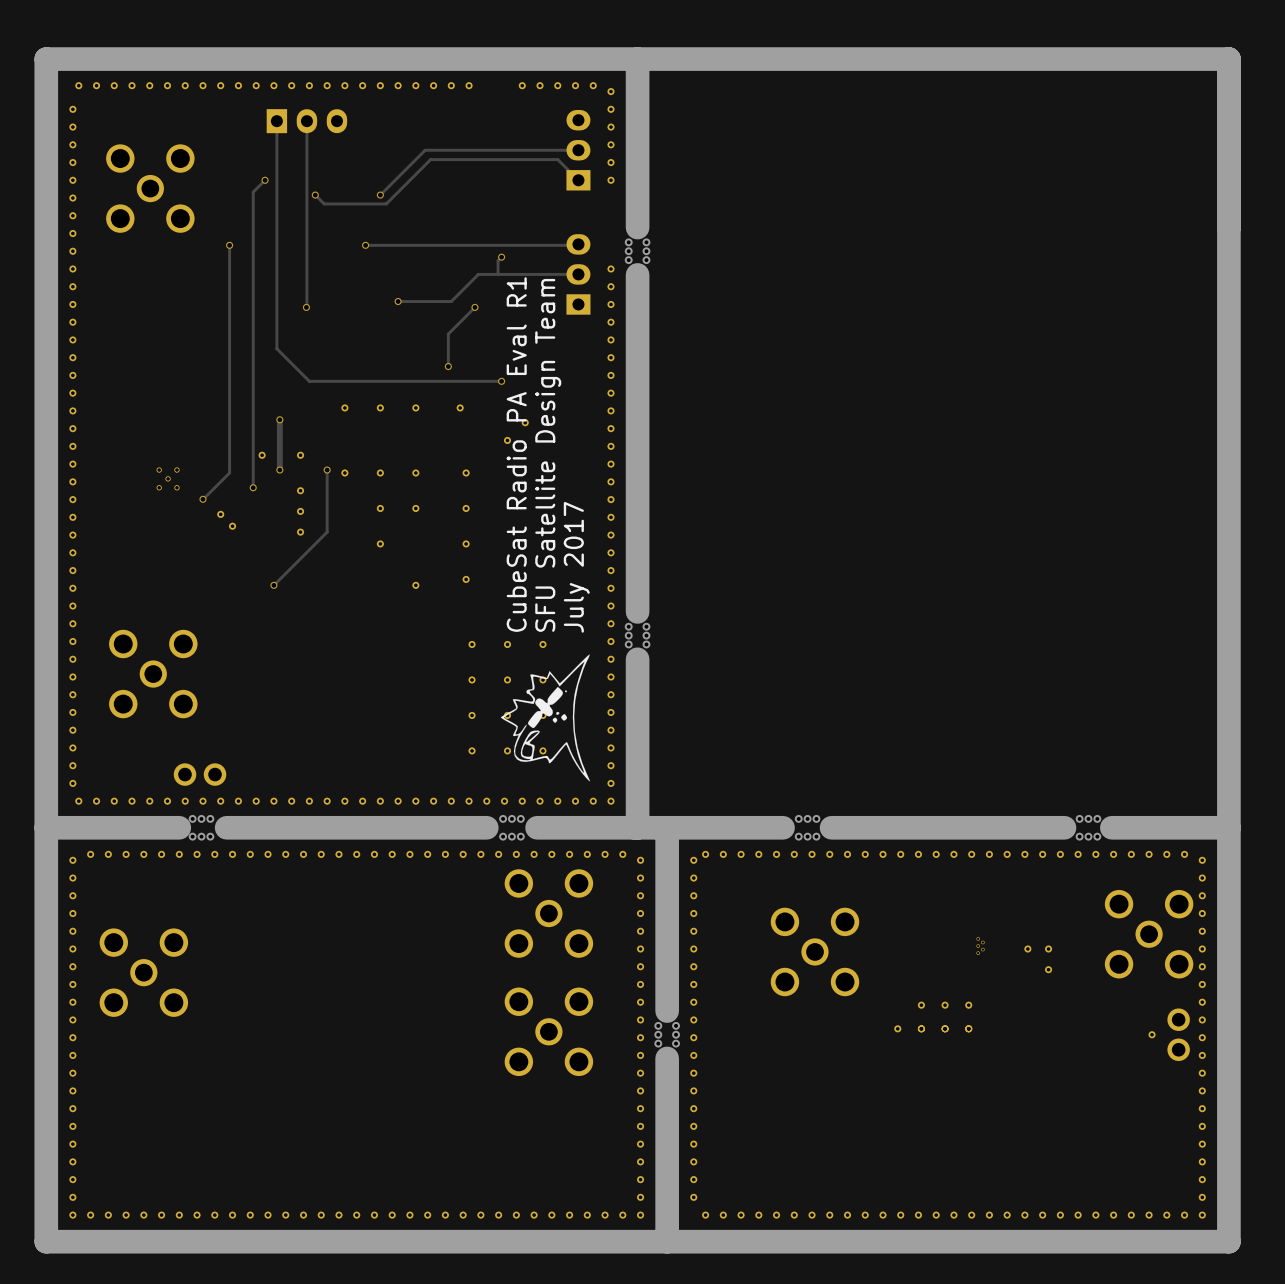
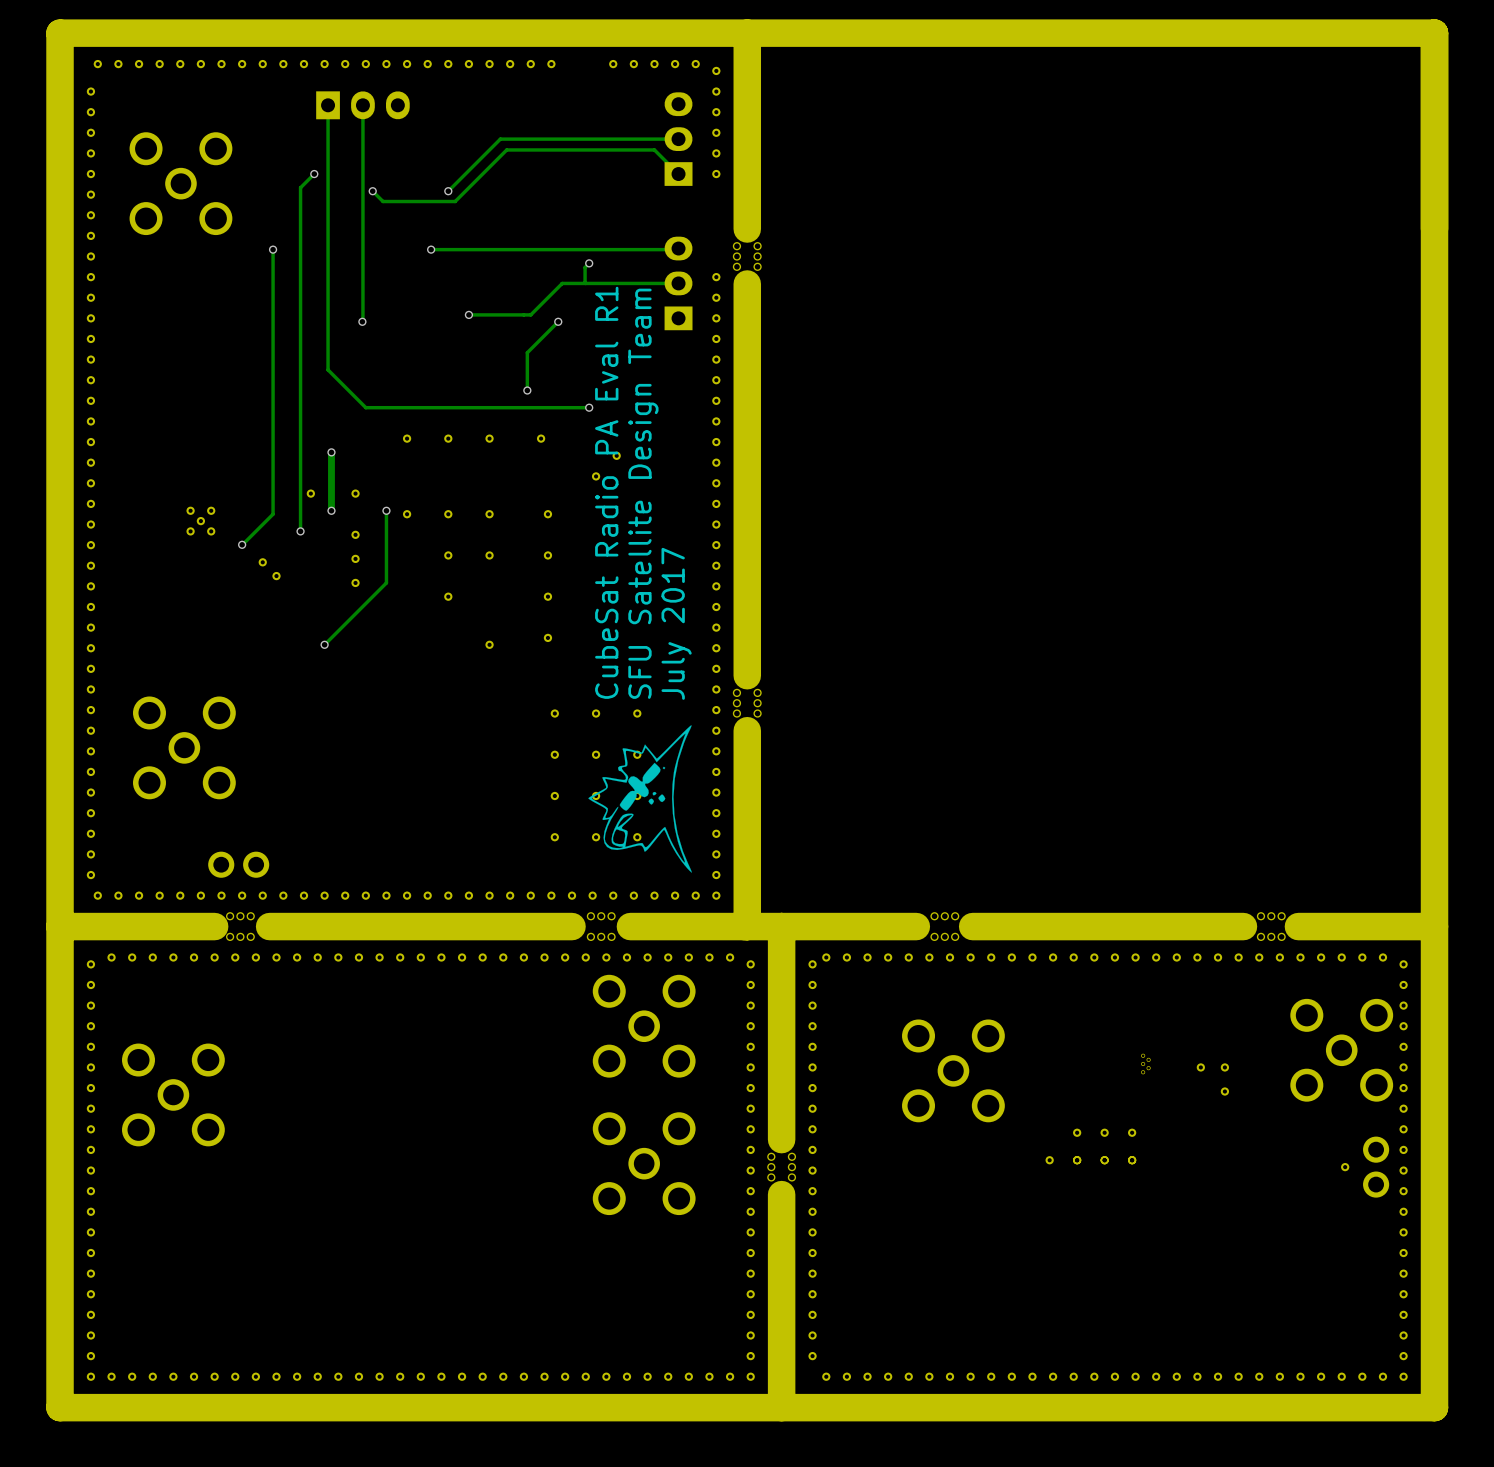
part footprint: [156, 467, 180, 491] -> [196, 516, 206, 526]
part: none -> (190, 510)
part: none -> (211, 510)
part: none -> (190, 531)
part: none -> (211, 531)

